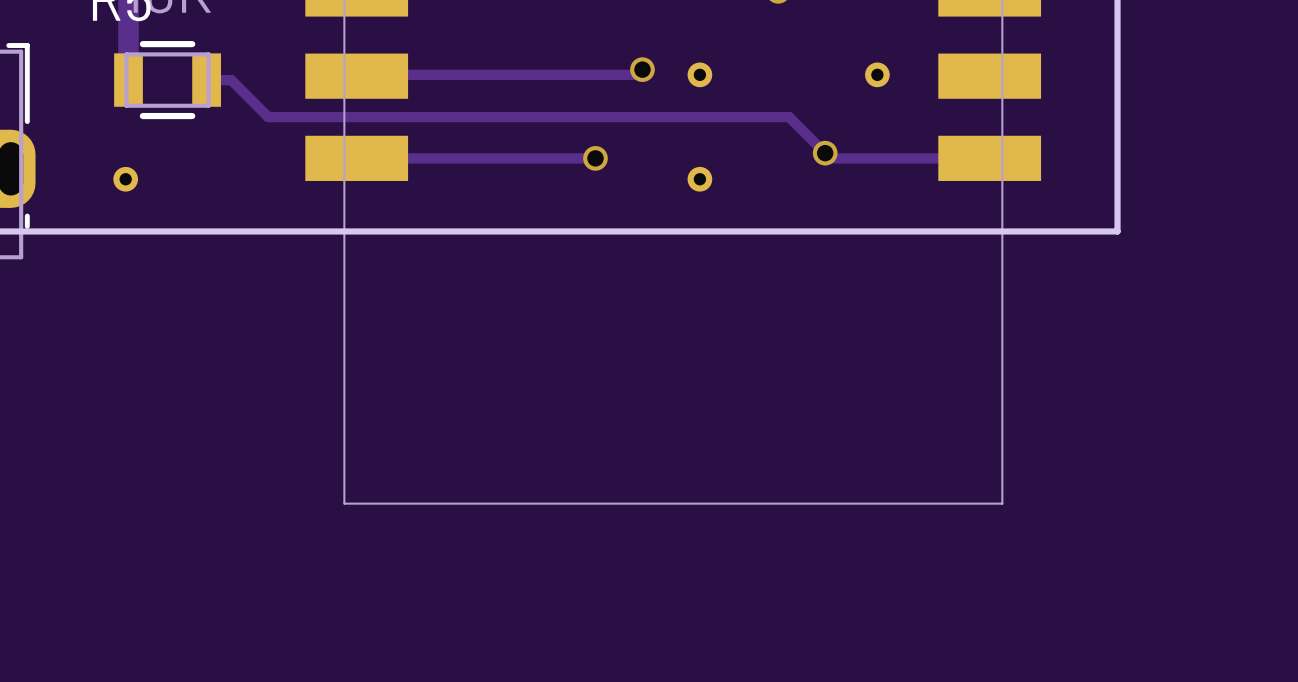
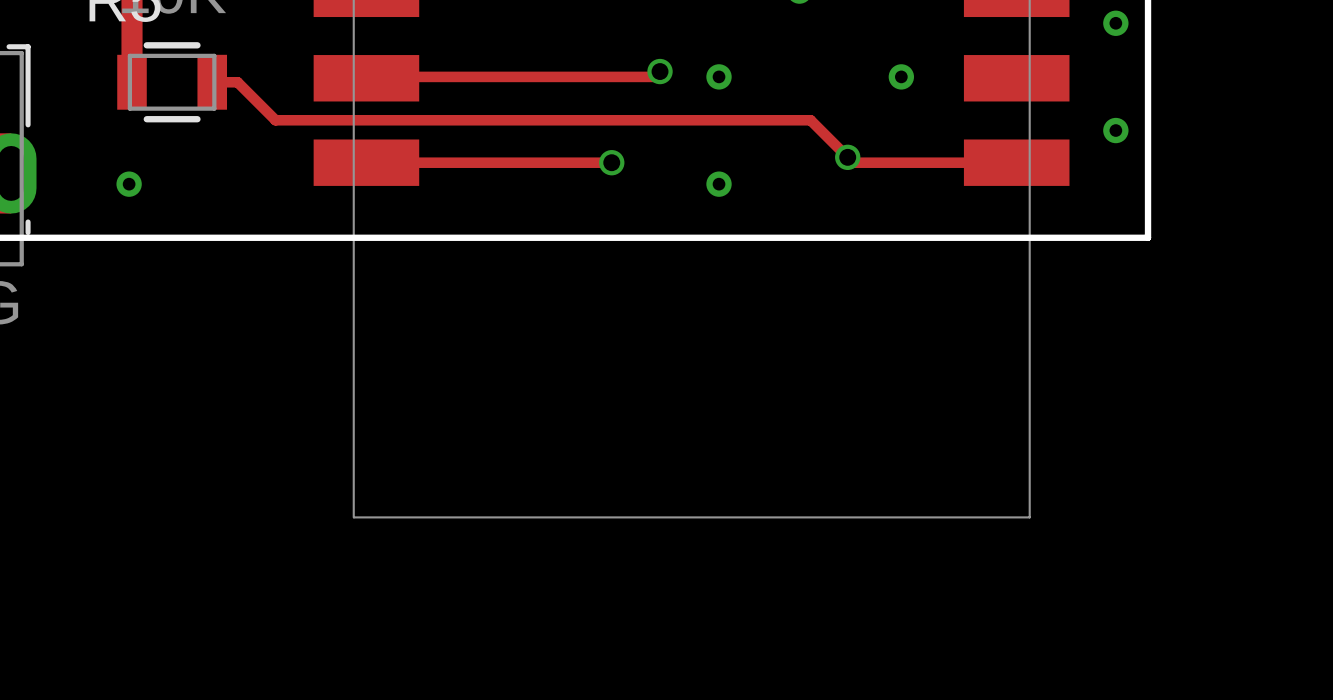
part: none -> (1115, 23)
part: none -> (1115, 130)

